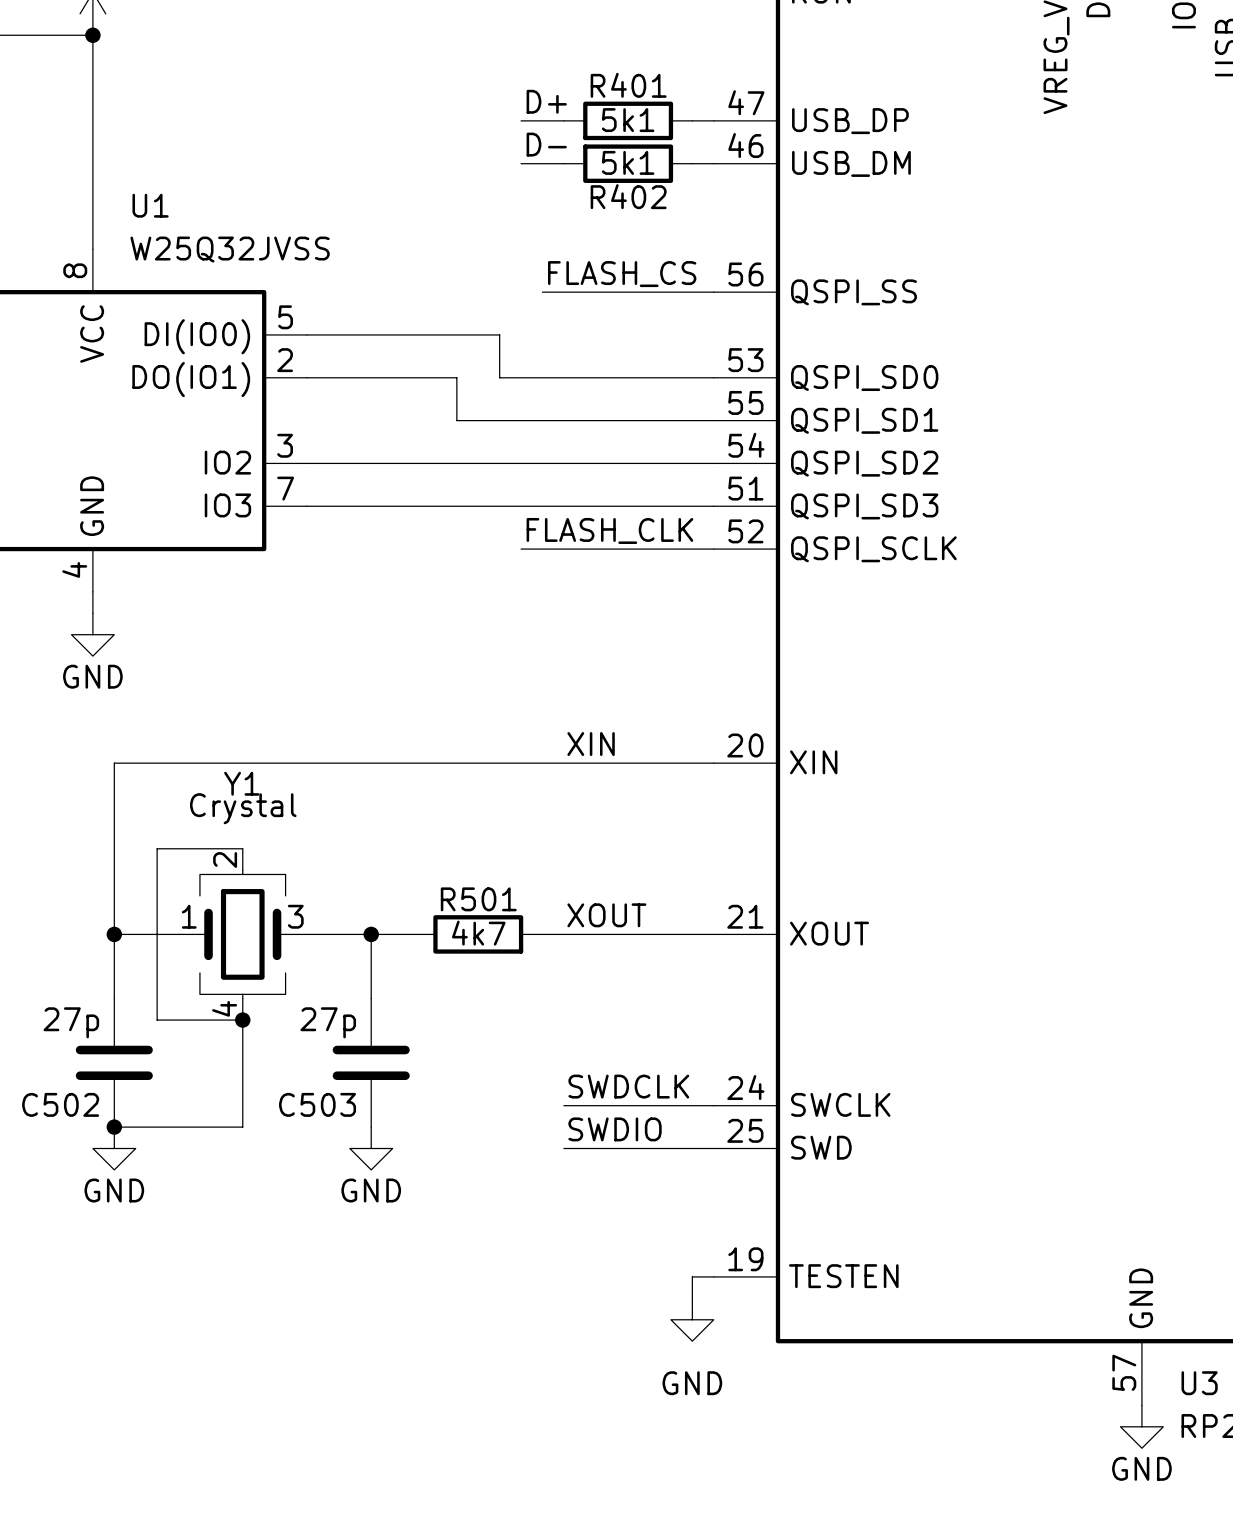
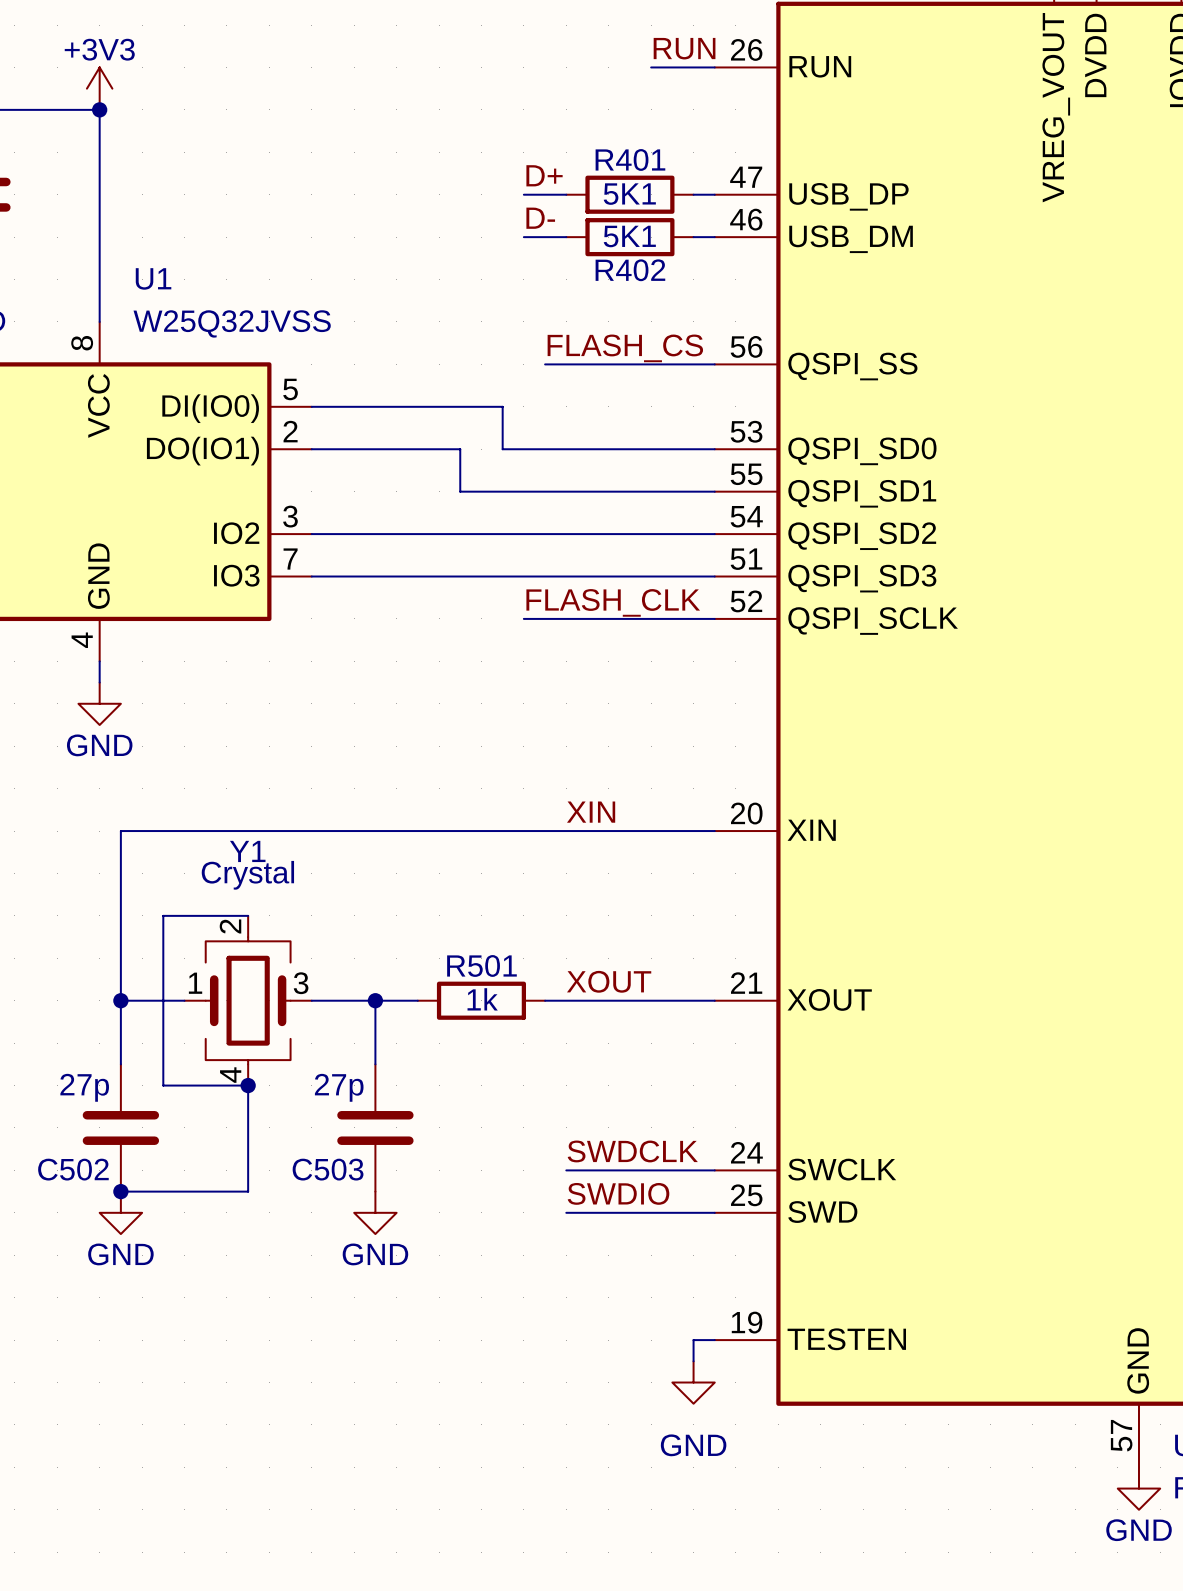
R401 value: 5k1 (628, 120) -> 5K1 (629, 194)
R402 value: 5k1 (628, 162) -> 5K1 (629, 236)
R501 value: 4k7 (478, 933) -> 1k (482, 999)

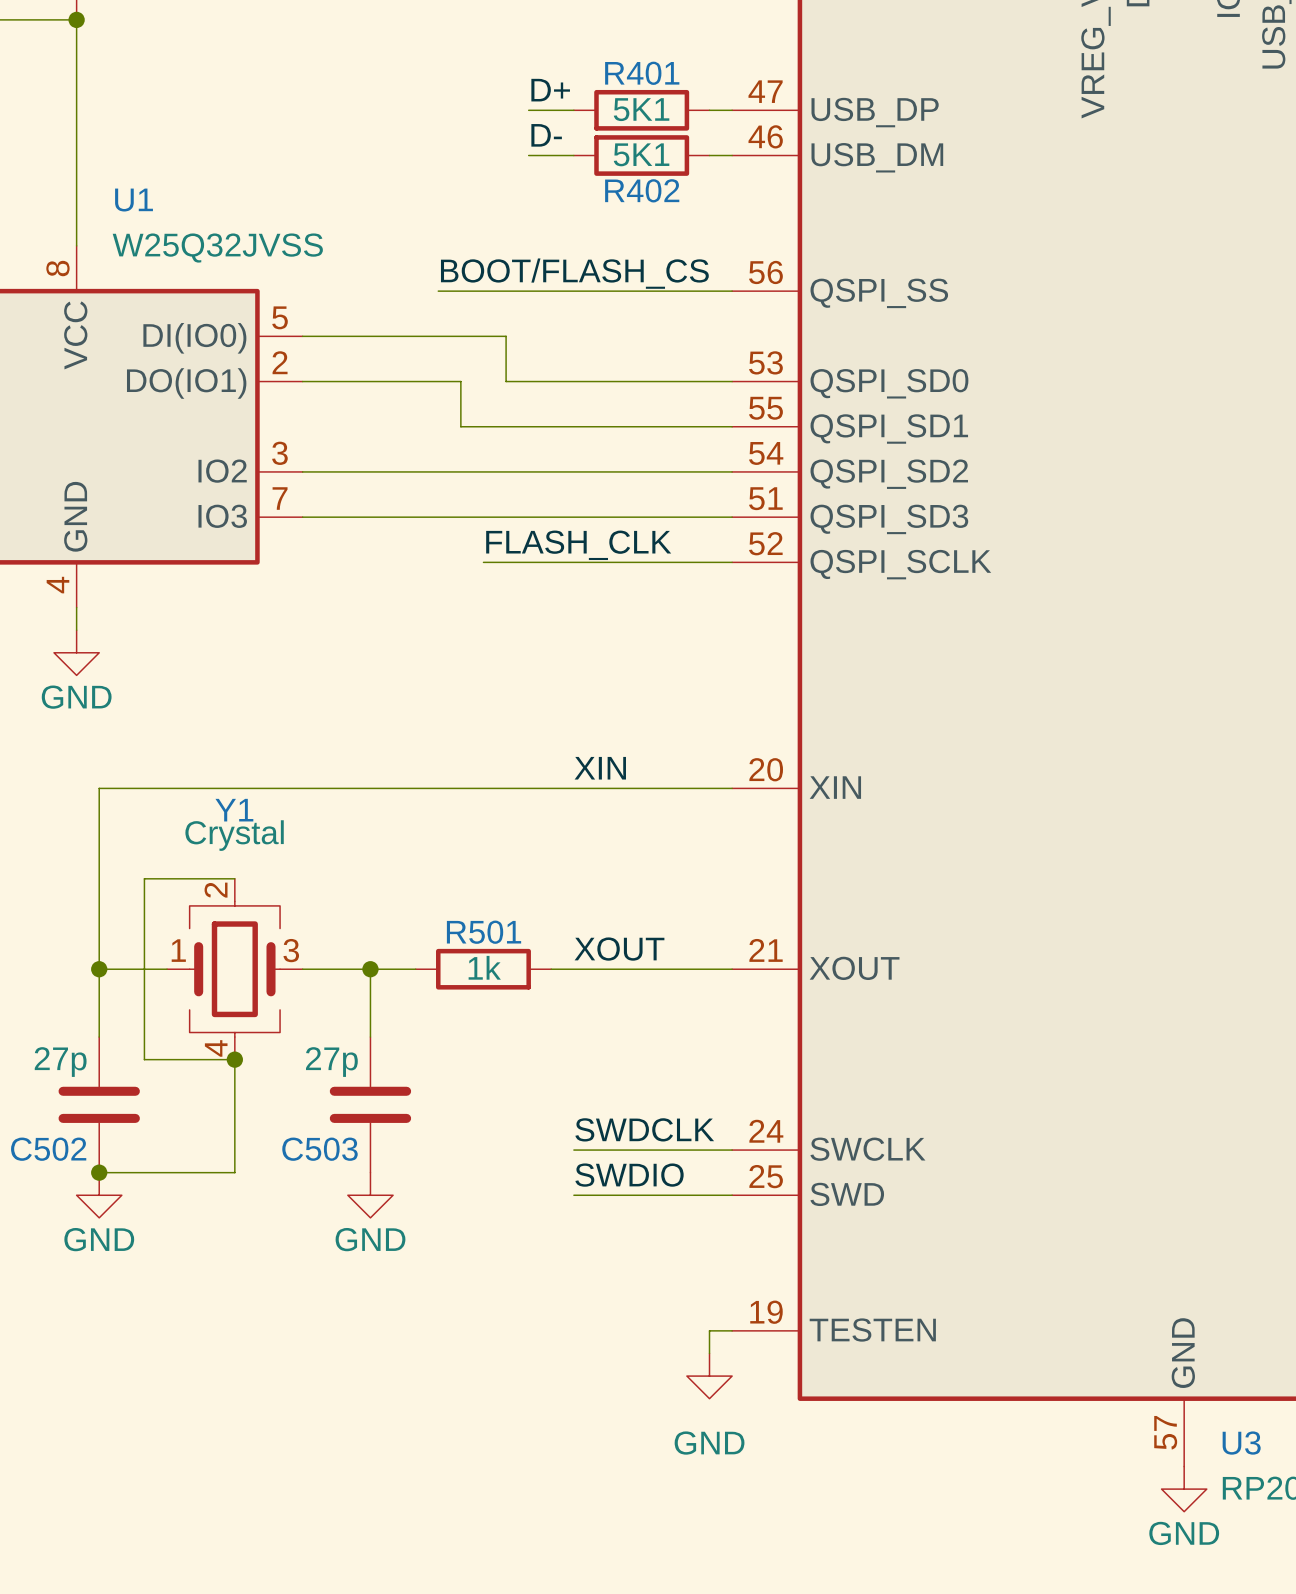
label: FLASH_CS (625, 348) -> BOOT/FLASH_CS (574, 273)
wire: none -> (438, 291) (551, 291)
label position: FLASH_CLK (613, 602) -> FLASH_CLK (578, 545)
wire: none -> (483, 562) (528, 562)

